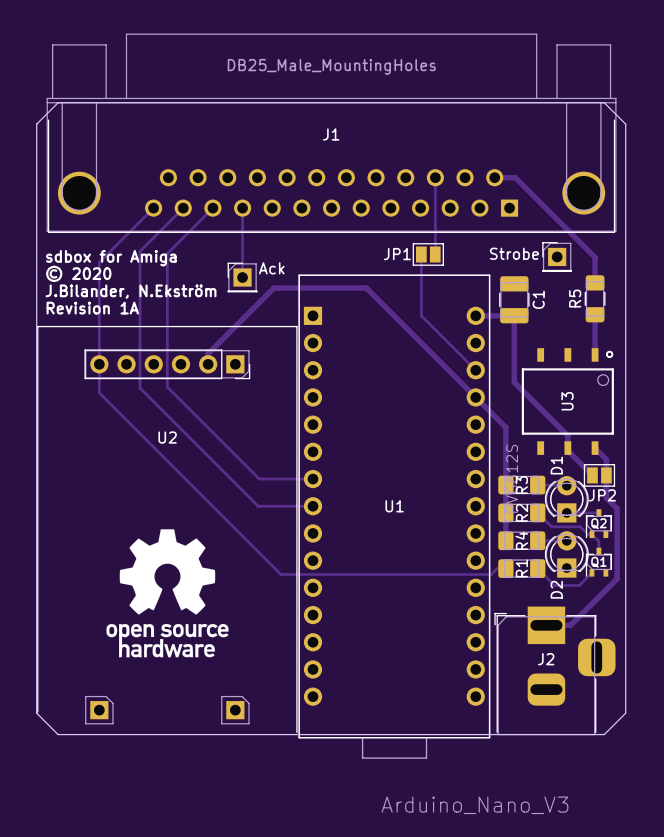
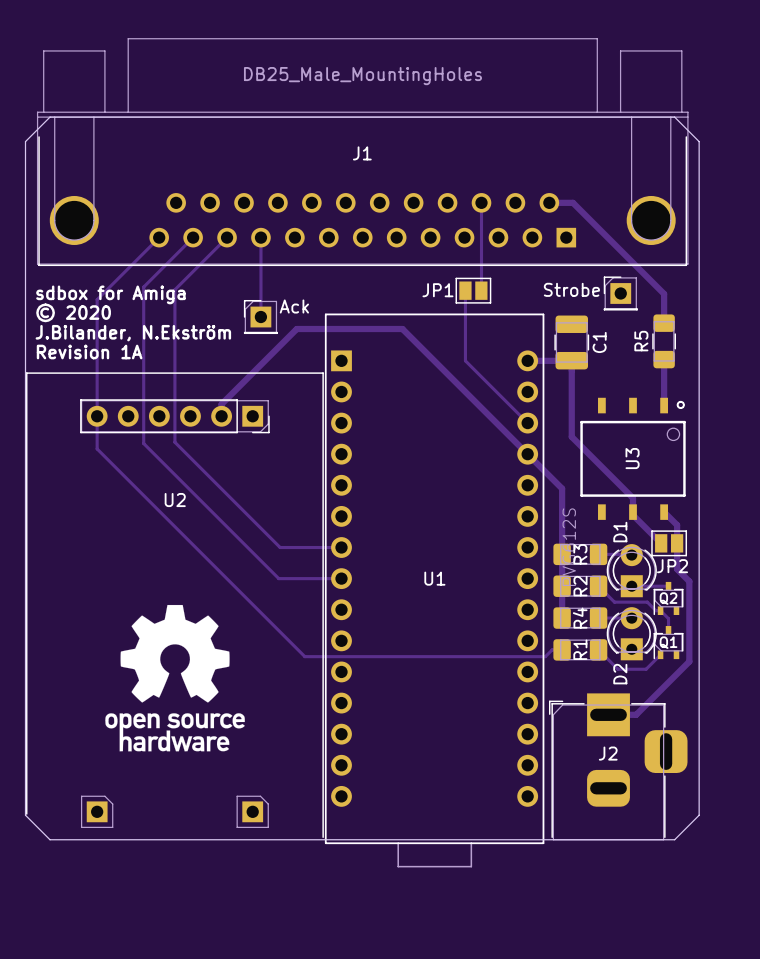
U1 value: Arduino_Nano_V3 (474, 805) -> none

